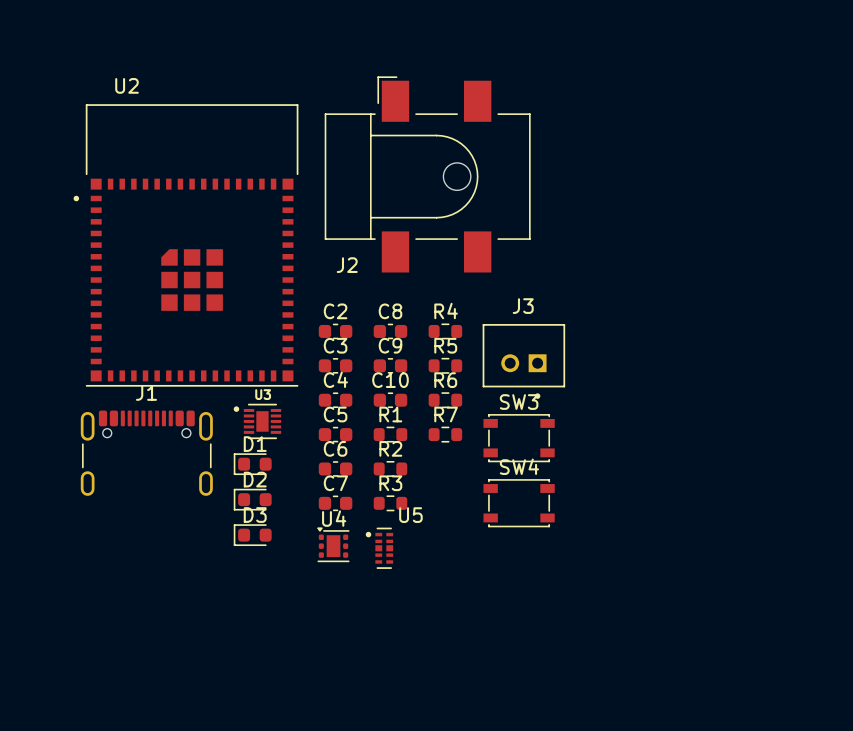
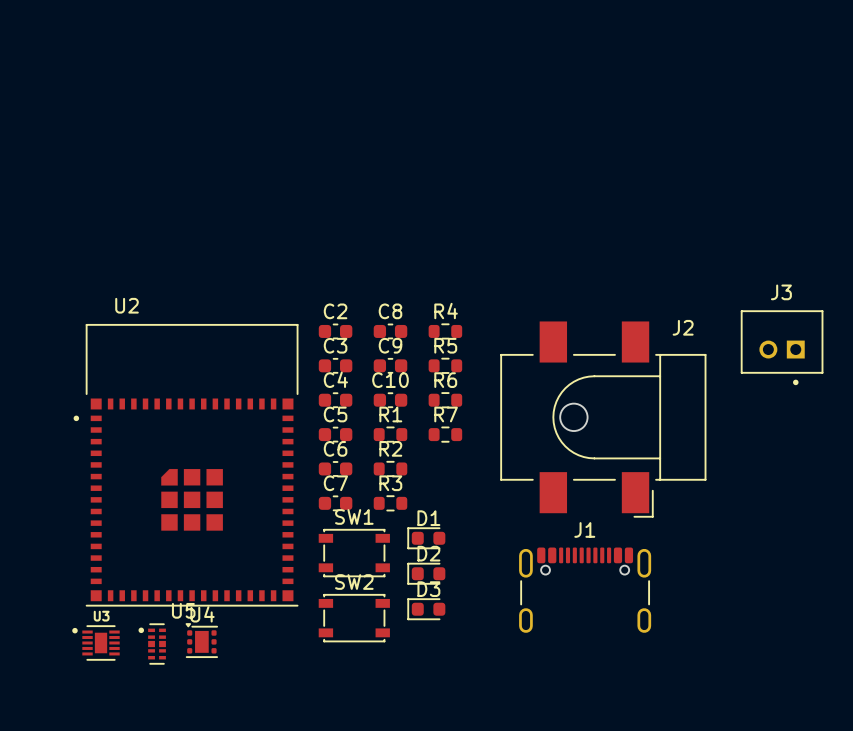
J2 rotation: 0° (427, 174) -> 180° (603, 419)
J2 position: (427, 174) -> (603, 419)
U2 position: (186, 245) -> (186, 465)
J3 position: (523, 361) -> (782, 347)
U3 position: (257, 421) -> (95, 642)
SW3: (519, 438) -> none
J1 position: (146, 453) -> (585, 590)
D1 position: (252, 464) -> (426, 538)
D2 position: (252, 499) -> (426, 573)
SW4: (519, 503) -> none
D3 position: (252, 535) -> (426, 609)
U4 position: (333, 544) -> (201, 640)
U5 position: (379, 548) -> (152, 644)
SW1: none -> (354, 553)
SW2: none -> (354, 618)

